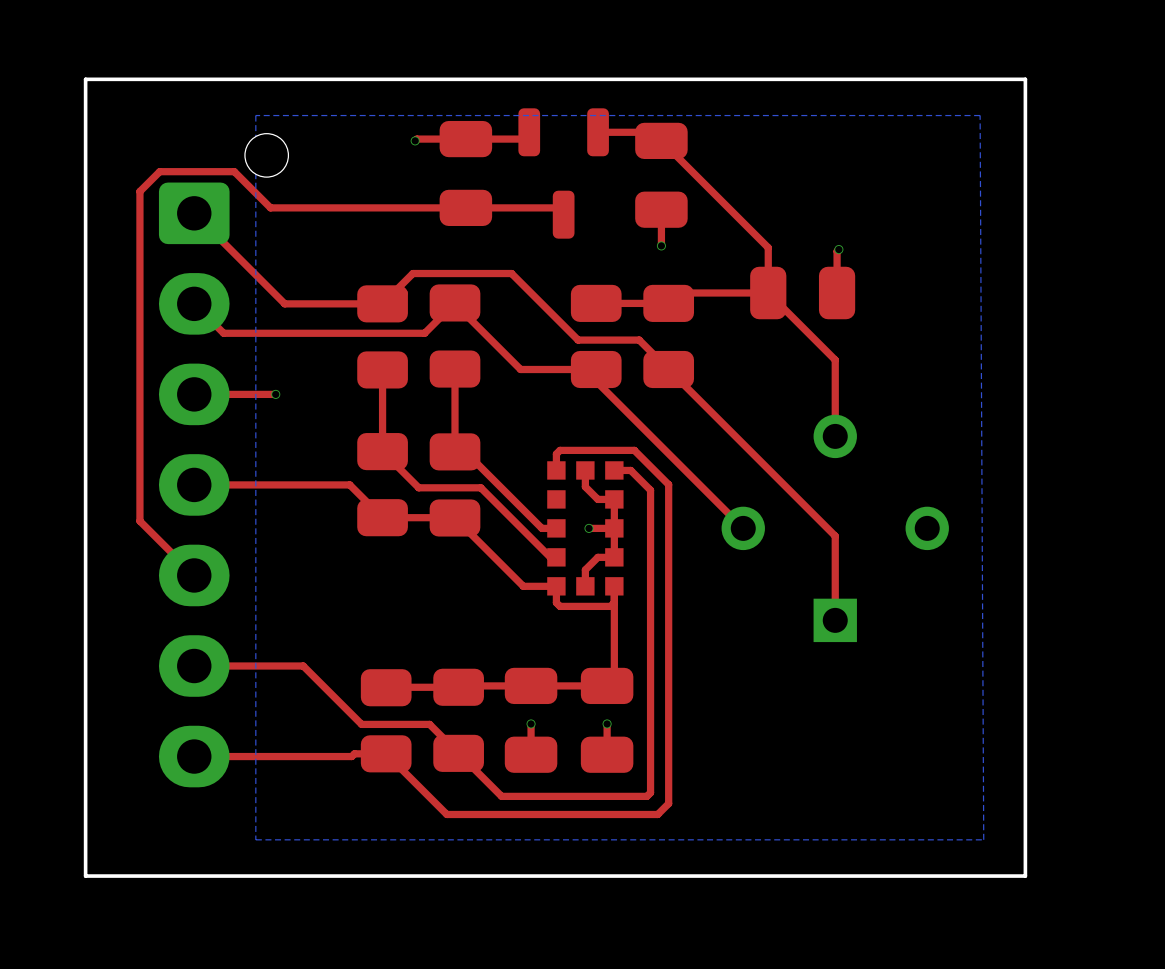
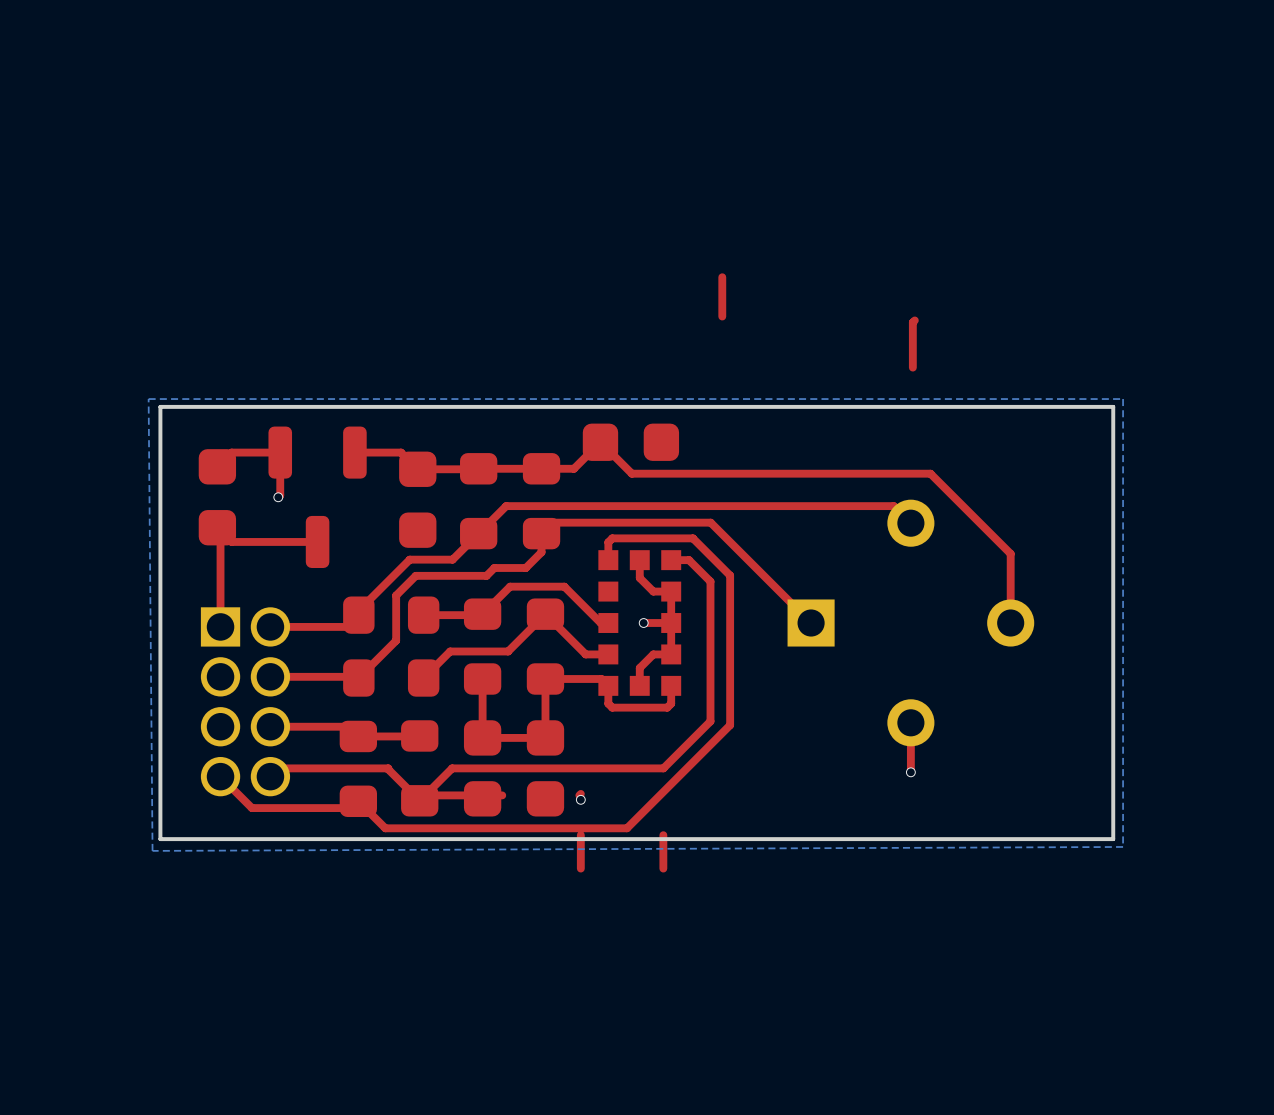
board edge: (1025, 79) (85, 79) (85, 876) (1025, 876) (1025, 79) -> none
bottom zone outline: (980, 115) (255, 115) (255, 839) (983, 839) (980, 115) -> (1123, 399) (1123, 846) (152, 850) (148, 399) (1123, 399)
top track: (529, 132) (522, 139) (416, 139) (415, 140) -> none
top track: (598, 132) (652, 132) (768, 247) (768, 292) -> none
via: (415, 140) -> none
part: (465, 173) -> none
part position: (563, 173) -> (317, 497)
part: (661, 175) -> none
top track: (194, 213) (284, 303) (382, 303) (412, 273) (511, 273) (578, 340) (639, 340) (835, 536) (835, 620) -> (910, 772) (910, 722)
top track: (563, 214) (556, 207) (270, 207) (234, 171) (159, 171) (139, 191) (139, 521) (194, 575) -> none
via: (661, 245) -> none
via: (838, 249) -> none
part footprint: [570, 284, 622, 389] -> [582, 423, 680, 461]
top track: (768, 292) (835, 359) (835, 436) -> (270, 626) (347, 626) (358, 615) (358, 610) (409, 559) (452, 559) (506, 506) (893, 506) (910, 523)
top track: (768, 292) (679, 292) (668, 303) (596, 303) -> none
part: (802, 292) -> none
top track: (194, 303) (223, 333) (424, 333) (455, 302) (520, 369) (596, 369) (596, 381) (650, 435) -> (270, 676) (358, 678) (396, 640) (396, 595) (415, 575) (486, 575) (494, 568) (525, 568) (541, 552) (541, 533) (552, 522) (710, 522)
board edge: none -> (1113, 406) (160, 406) (160, 839) (1113, 839) (1113, 406)
part: (382, 336) -> none
part: (455, 336) -> none
part: (668, 336) -> none
top track: (382, 369) (382, 459) -> none
top track: (455, 369) (455, 451) (465, 451) (541, 528) (549, 528) -> (423, 615) (481, 615) (510, 586) (564, 586) (600, 623)
top track: none -> (354, 452) (401, 452) (417, 469) (478, 469)
top track: none -> (217, 466) (231, 452) (280, 452) (280, 495) (278, 497)
top track: none -> (478, 468) (573, 468) (600, 442) (631, 473) (930, 473) (1010, 553) (1010, 623)
top track: (275, 394) (194, 394) -> none
via position: (275, 394) -> (278, 497)
part: none -> (217, 497)
part: none -> (417, 499)
part: none -> (478, 501)
part: none -> (541, 501)
top track: none -> (217, 527) (231, 541) (317, 541)
top track: none -> (220, 530) (220, 626)
top track: (382, 451) (418, 487) (480, 487) (550, 557) -> (423, 678) (450, 651) (508, 651) (545, 614) (585, 654) (601, 654)
part: (223, 460) -> none
top track: (194, 484) (349, 484) (382, 517) -> none
part: (382, 484) -> none
part: (455, 484) -> none
top track: (382, 517) (454, 517) (523, 586) (556, 586) -> (482, 678) (482, 737) (545, 737) (545, 678) (601, 678) (608, 685)
part: none -> (391, 615)
part rotation: 0° (835, 528) -> 90° clockwise (910, 623)
part: none -> (482, 646)
part: none -> (545, 646)
part: none -> (391, 678)
part: none -> (245, 701)
top track: (614, 602) (614, 678) (607, 685) (459, 685) (458, 687) -> none
top track: (650, 619) (650, 792) (646, 796) (501, 796) (429, 724) (361, 724) (303, 666) (194, 666) -> (710, 721) (663, 768) (452, 768) (419, 800) (388, 768) (278, 768) (270, 776)
top track: (668, 622) (668, 803) (657, 814) (446, 814) (386, 753) (354, 753) (351, 756) (194, 756) -> (730, 725) (627, 828) (385, 828) (358, 801) (351, 808) (251, 808) (220, 776)
top track: none -> (270, 726) (348, 726) (358, 736) (419, 736)
part: none -> (358, 768)
part: none -> (419, 768)
part: none -> (482, 768)
part: none -> (545, 768)
via: none -> (910, 772)
part: (386, 720) -> none
part: (458, 720) -> none
part: (531, 720) -> none
part: (607, 720) -> none
via position: (531, 723) -> (580, 799)
via: (607, 723) -> none

